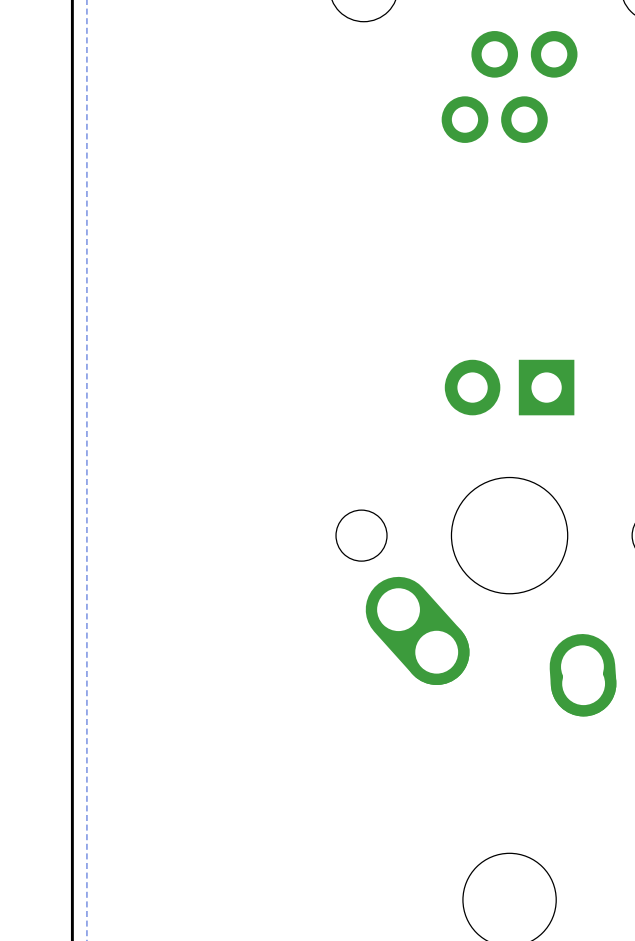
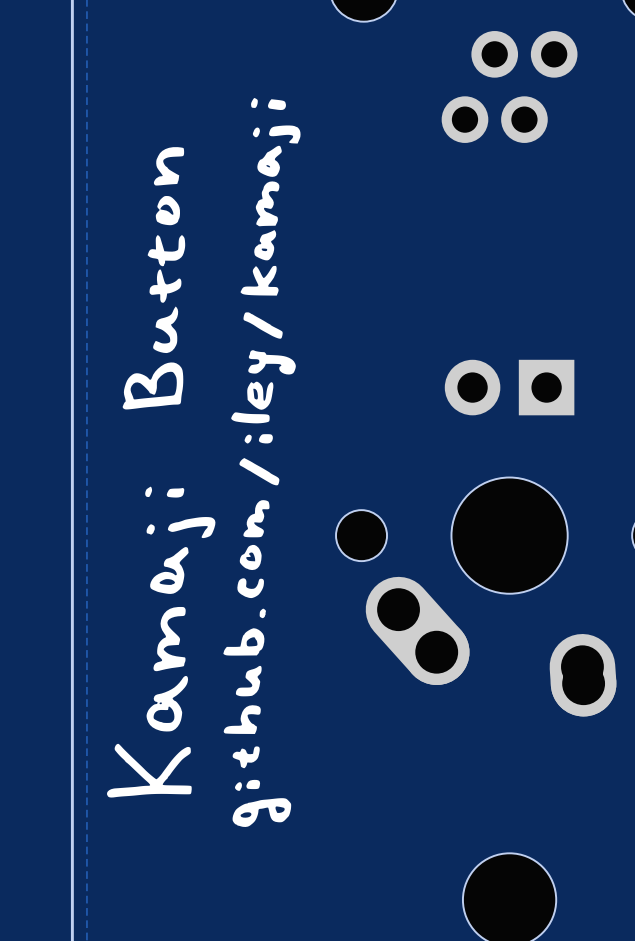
drawing: none -> [107, 97, 301, 827]

